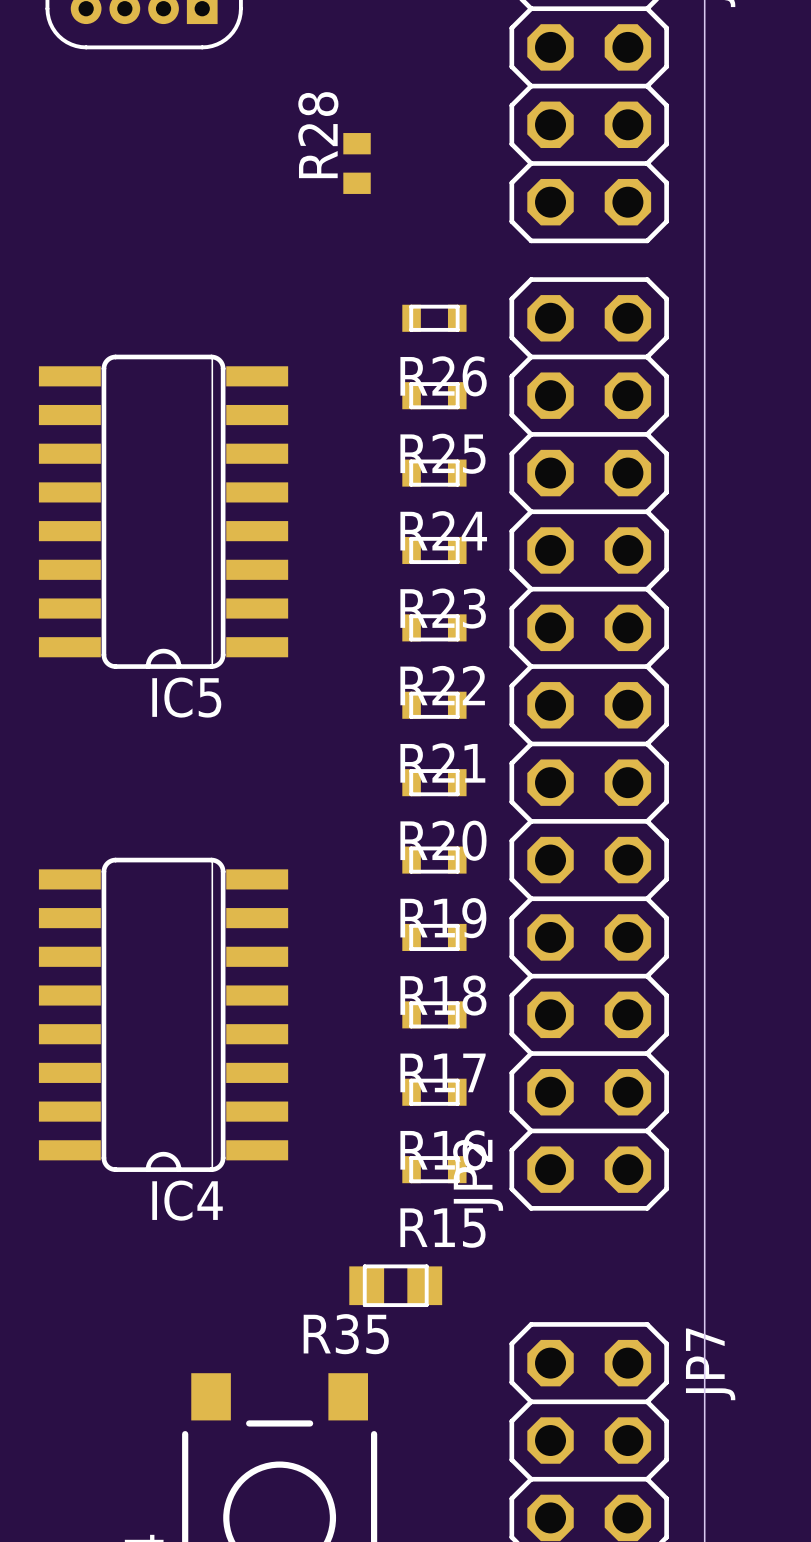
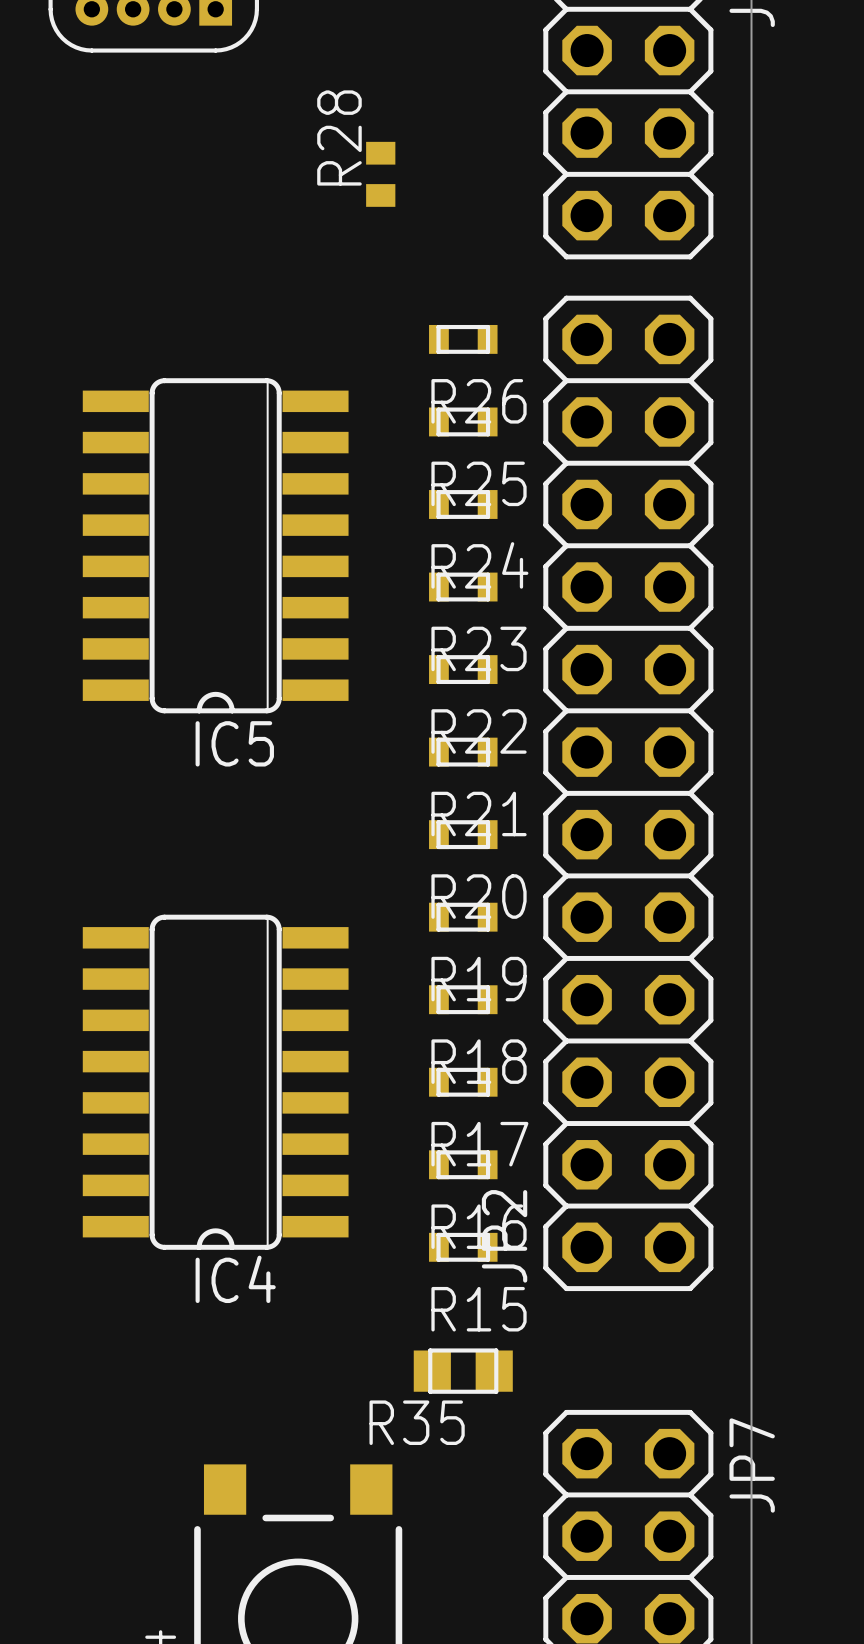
IC5 position: (163, 511) -> (215, 545)
IC4 position: (163, 1014) -> (215, 1082)
R35 position: (395, 1285) -> (463, 1371)

